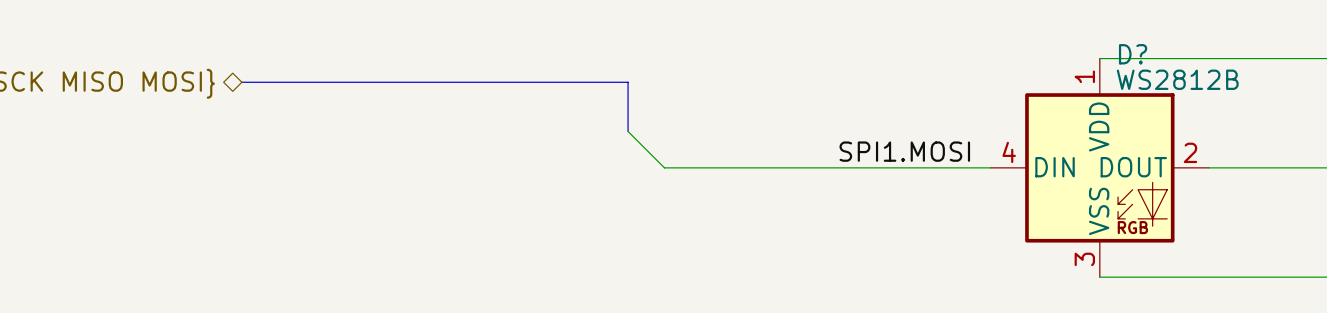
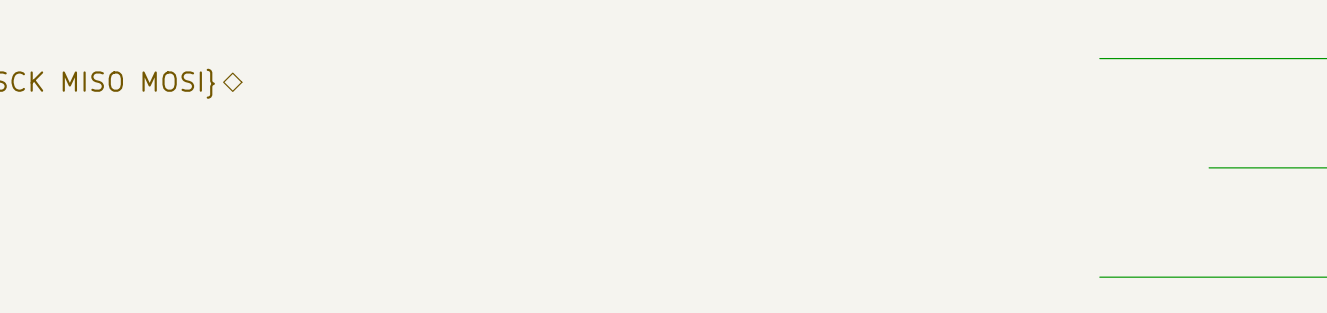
bus: (241, 82) (628, 82) (628, 131) -> none
wire: (628, 131) (664, 167) (990, 167) -> none
label: SPI1.MOSI (904, 151) -> none
D?: WS2812B (1099, 167) -> none

